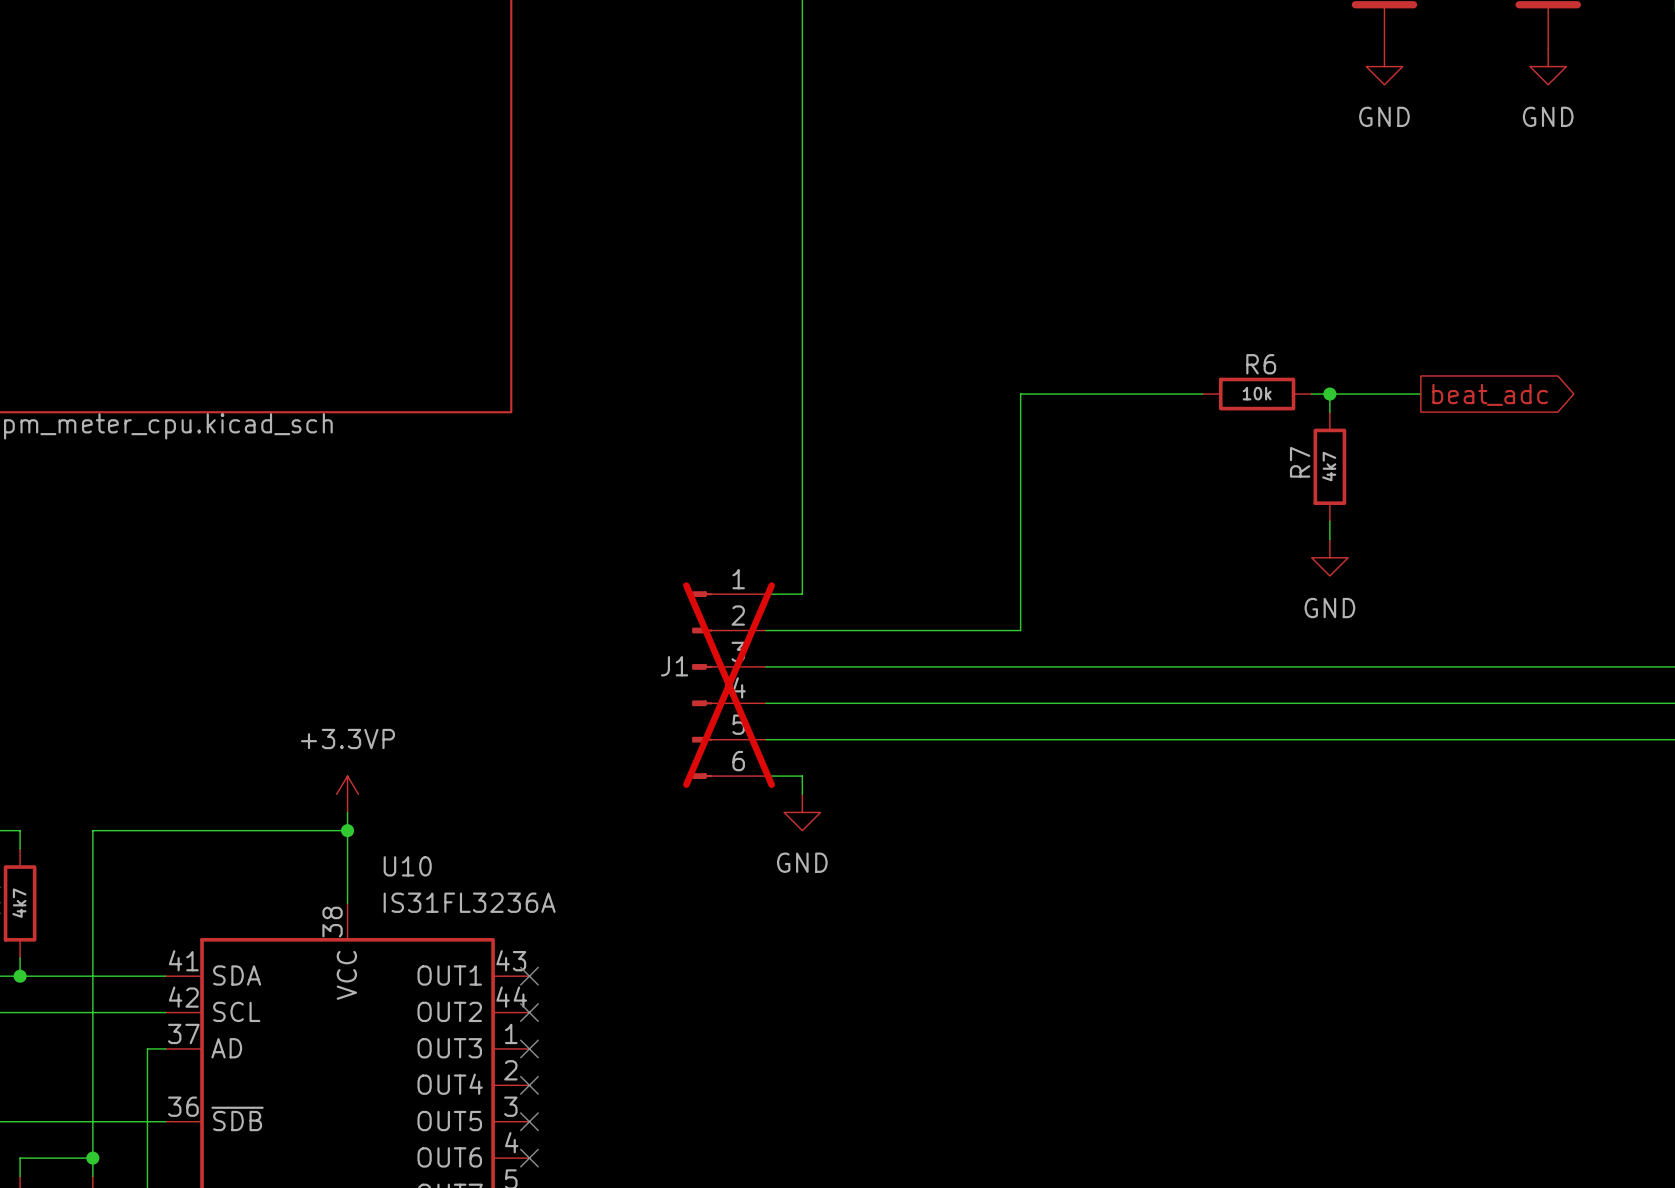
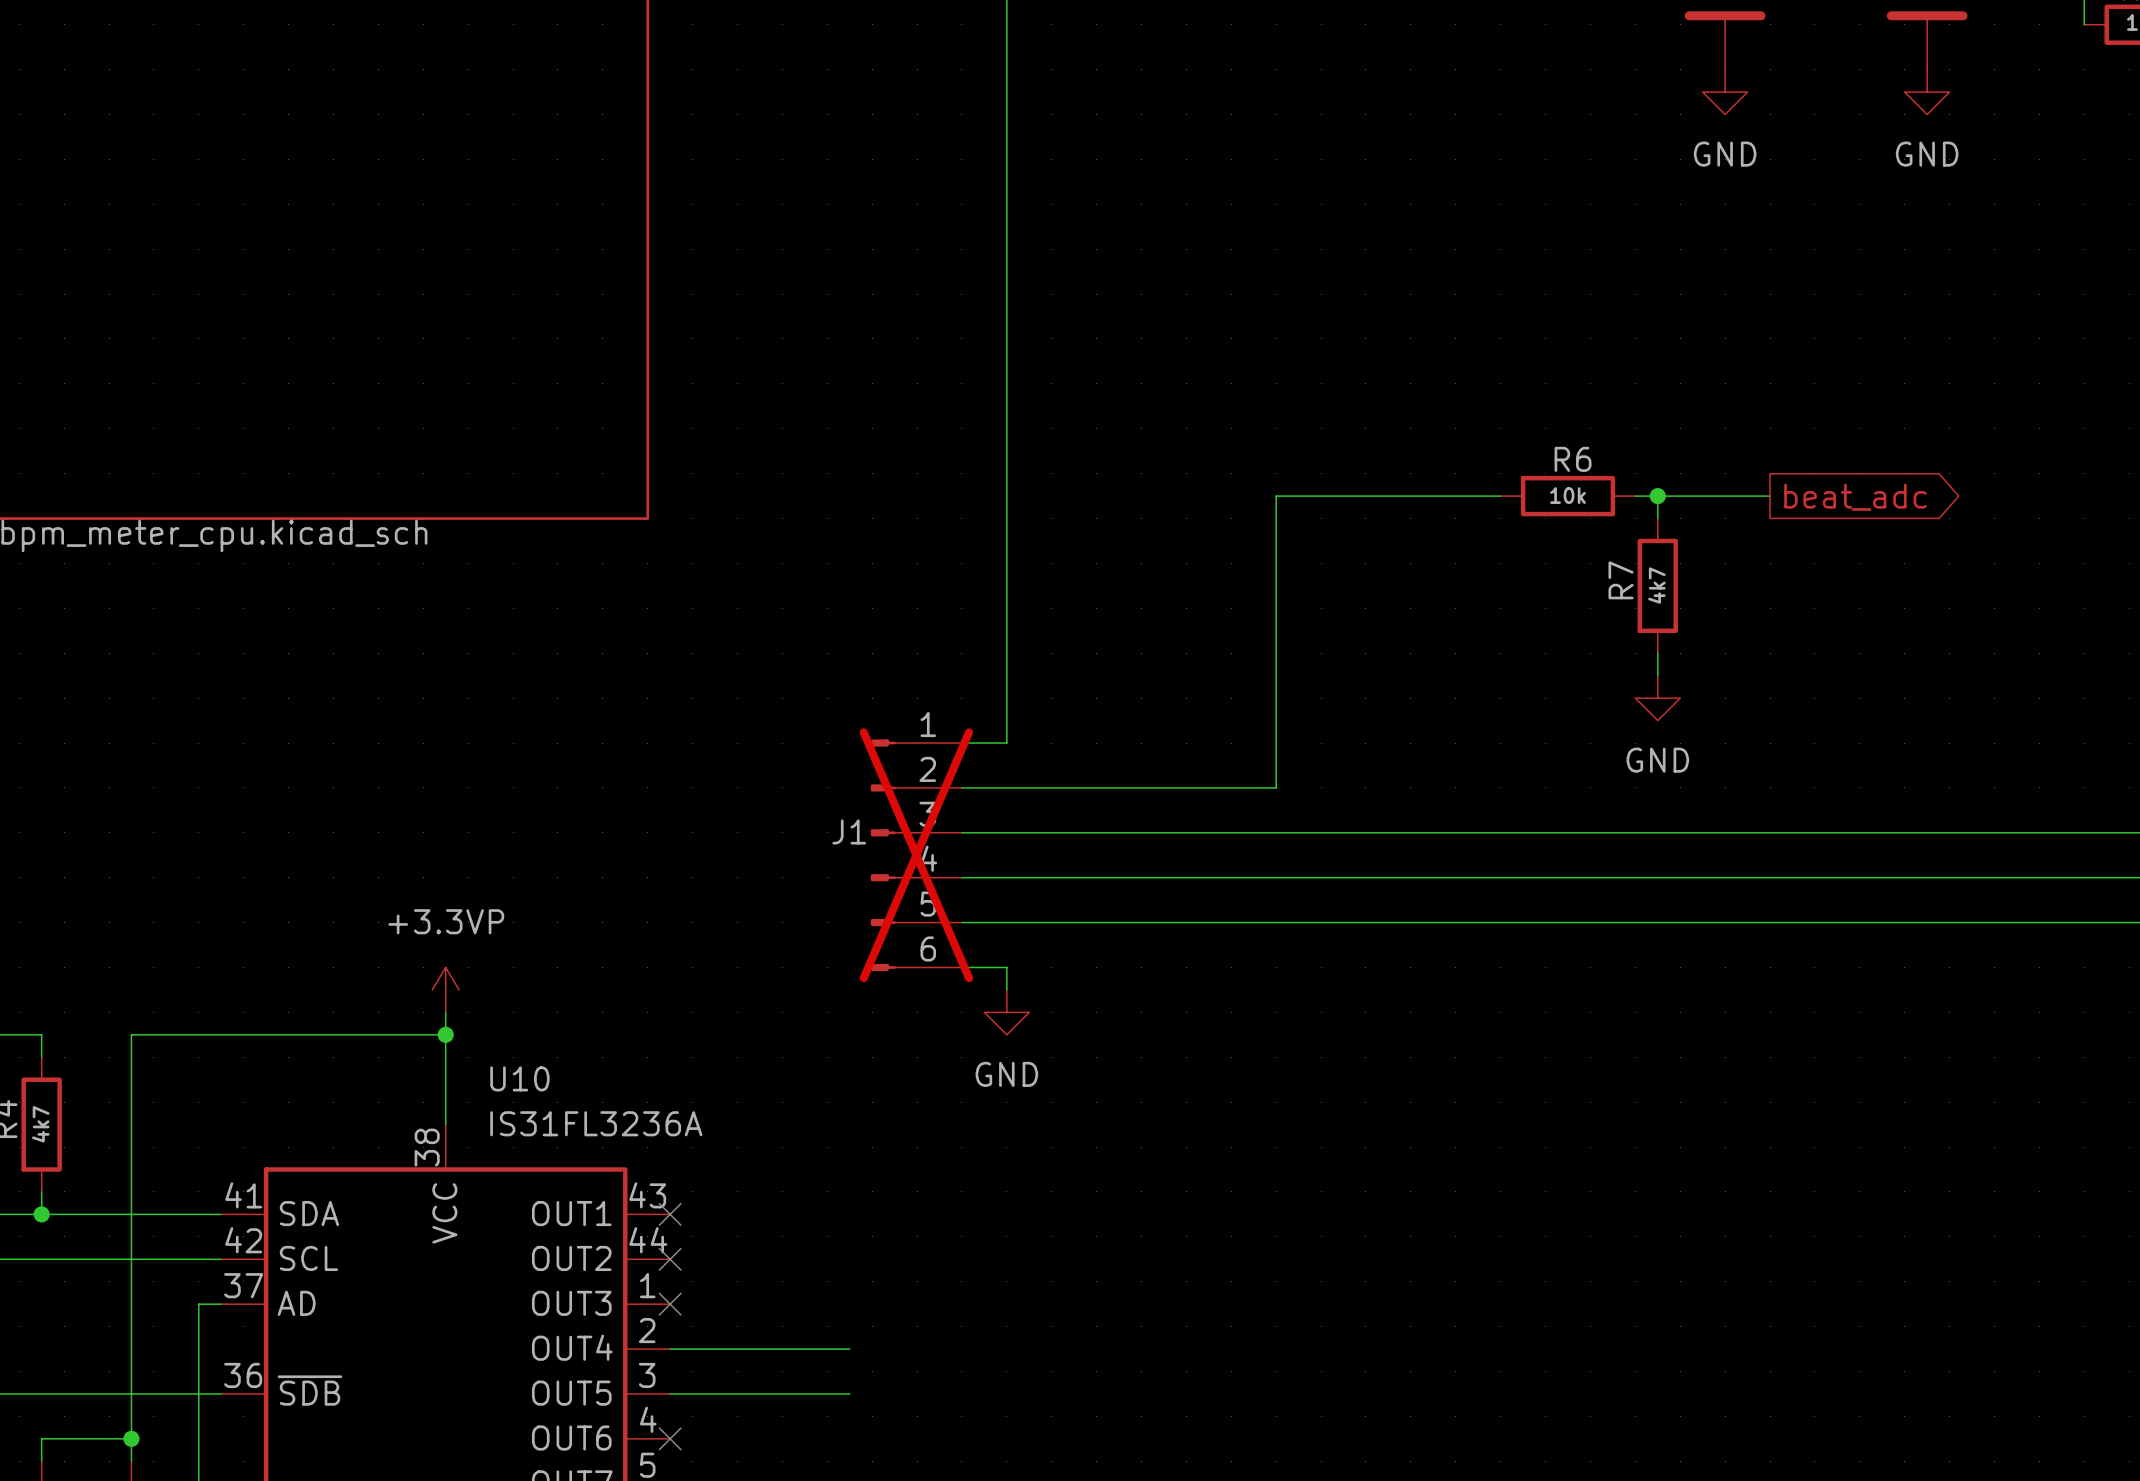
wire: none -> (670, 1349) (849, 1349)
no-connect mark: (529, 1085) -> none
wire: none -> (670, 1393) (849, 1393)
no-connect mark: (529, 1121) -> none

